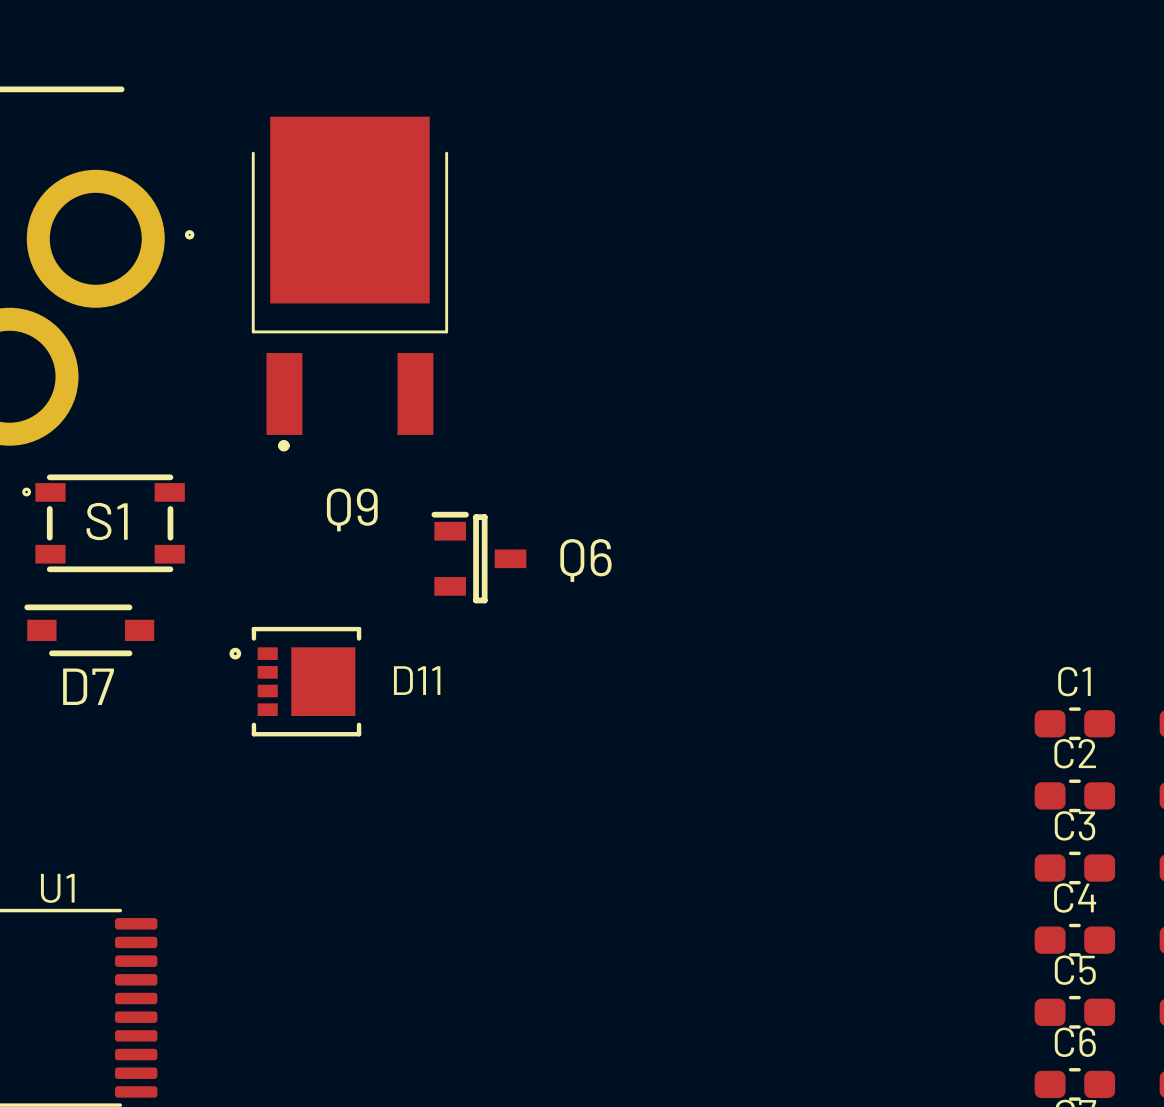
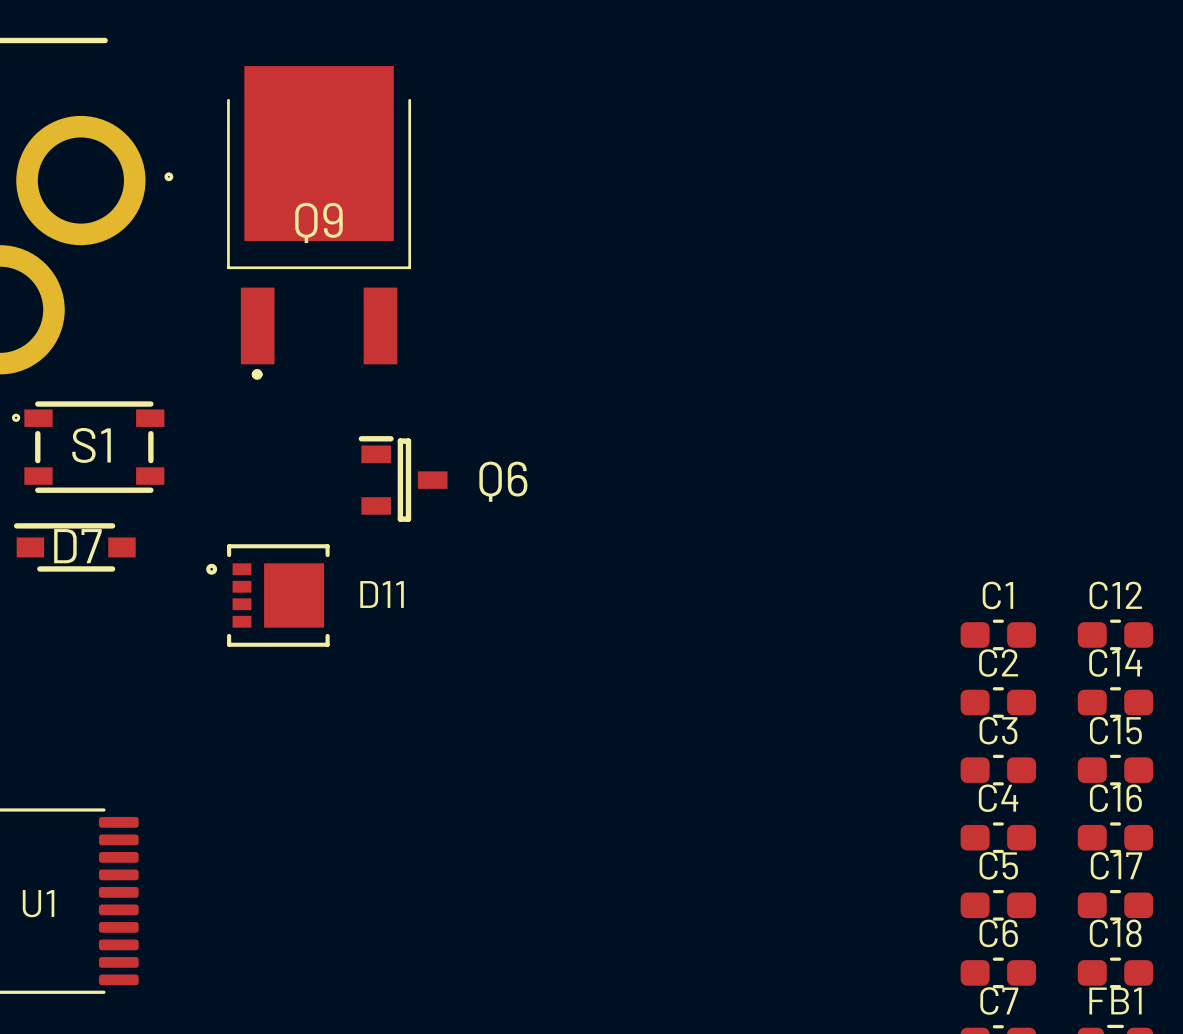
Q9 name position: Q9 (352, 509) -> Q9 (318, 222)
Q6 position: (478, 557) -> (403, 478)
D7 name position: D7 (88, 686) -> D7 (77, 546)
U1 name position: U1 (57, 888) -> U1 (38, 903)

